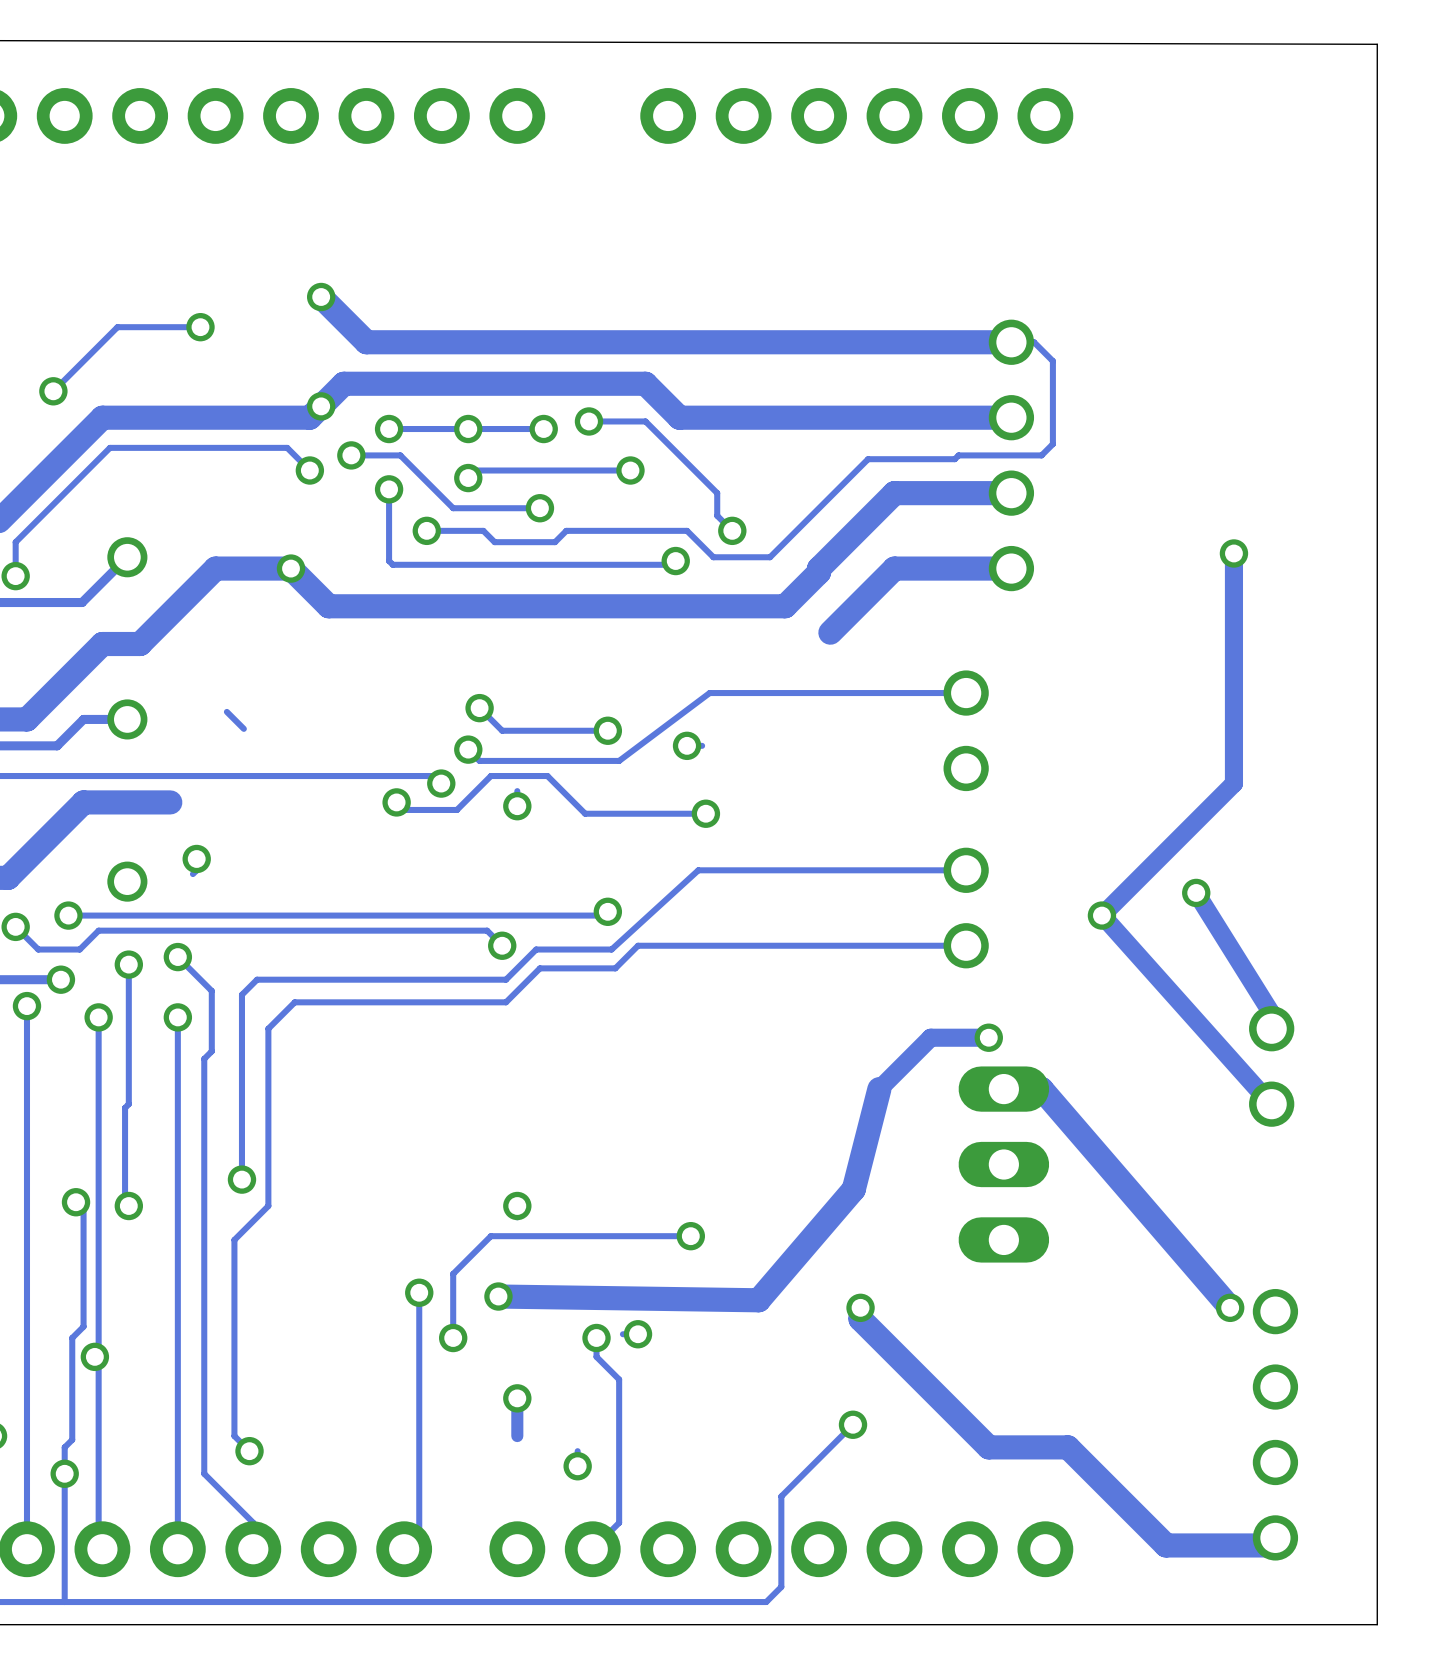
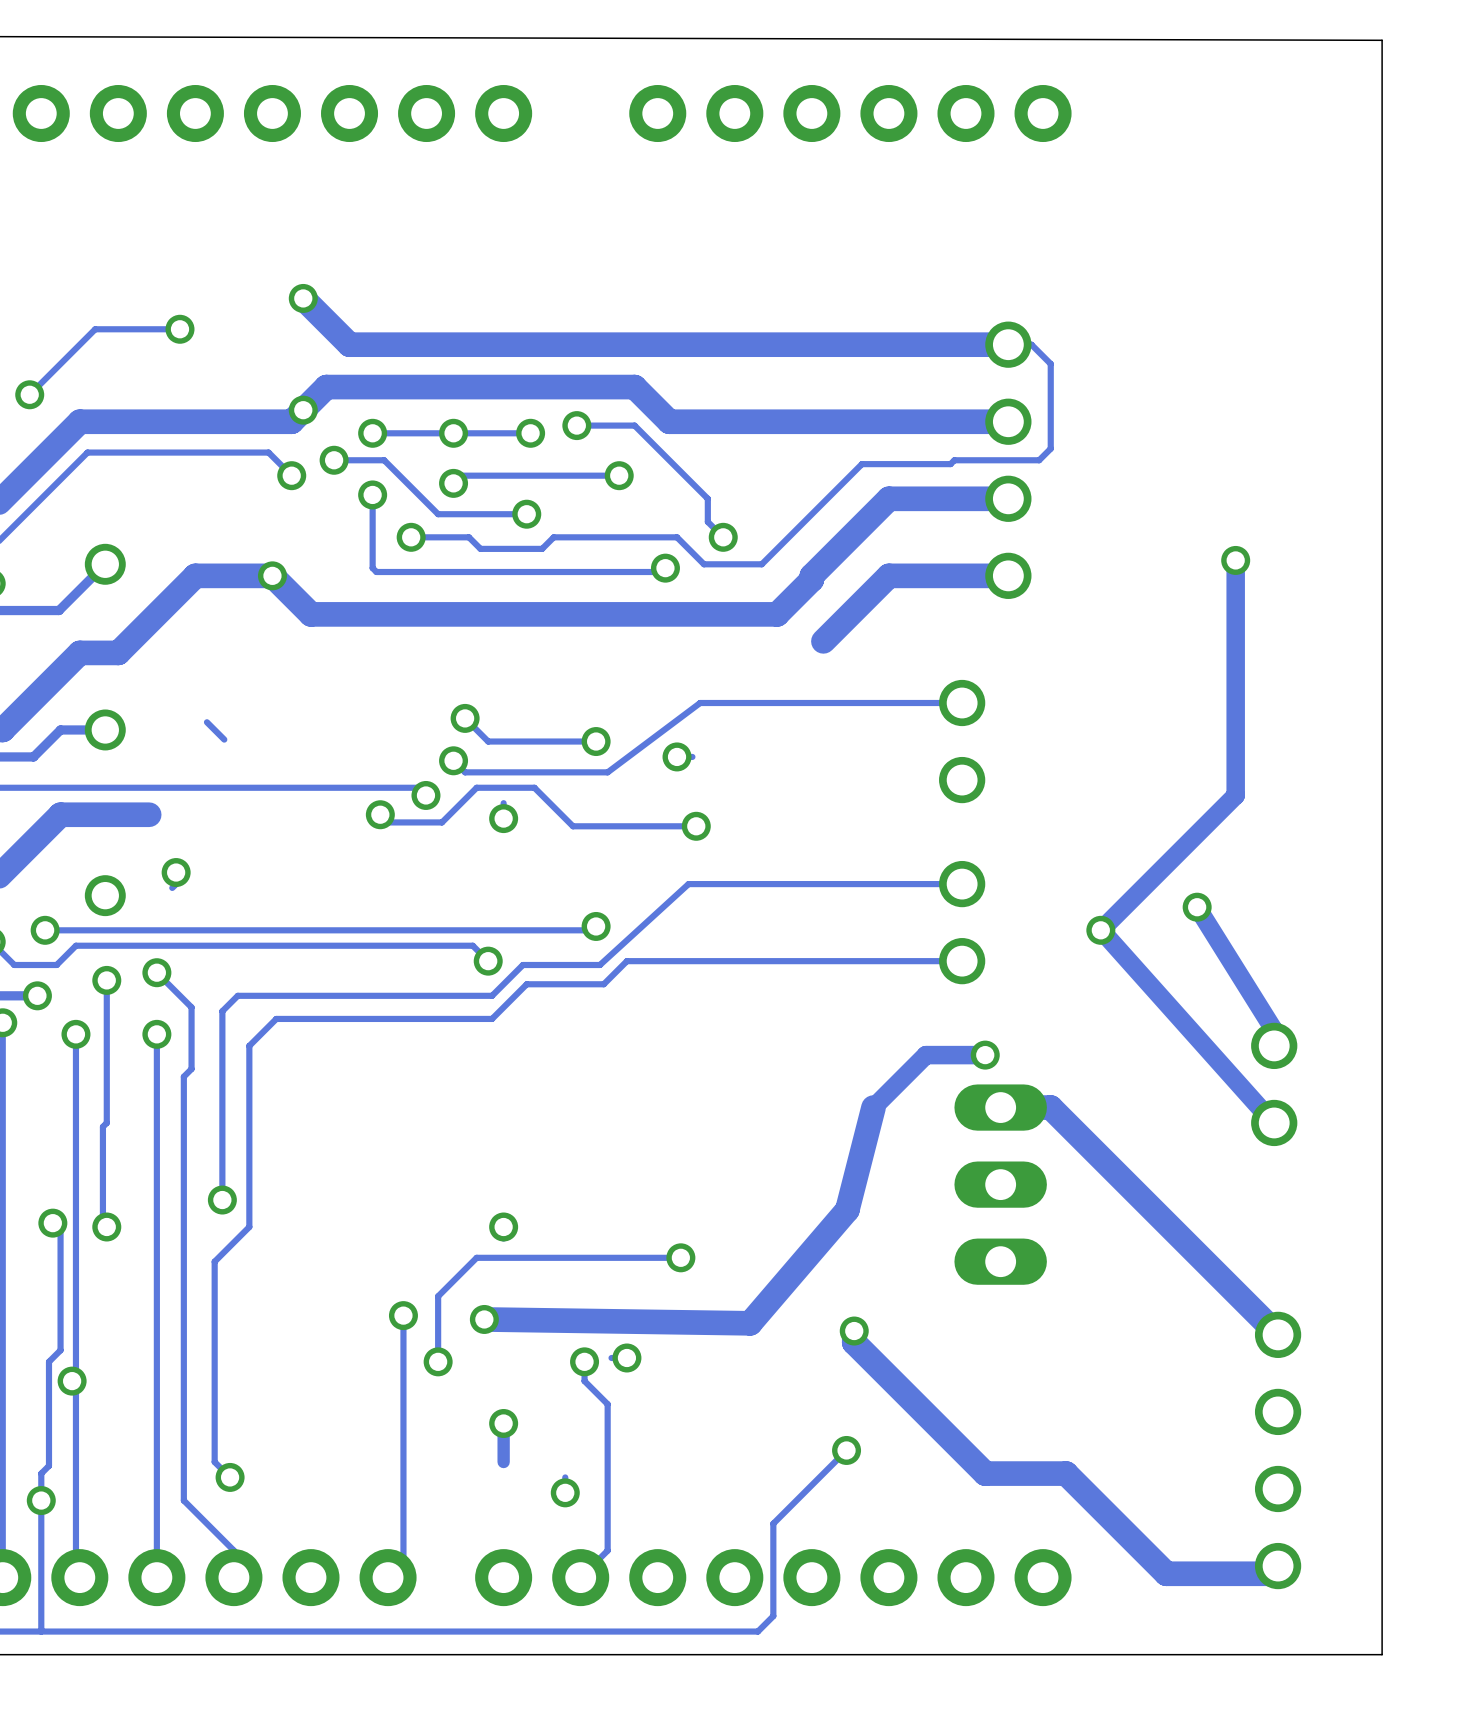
track: (1041, 1089) (1230, 1307) -> (1039, 1107) (1050, 1107) (1278, 1334)
via: (1230, 1307) -> none

